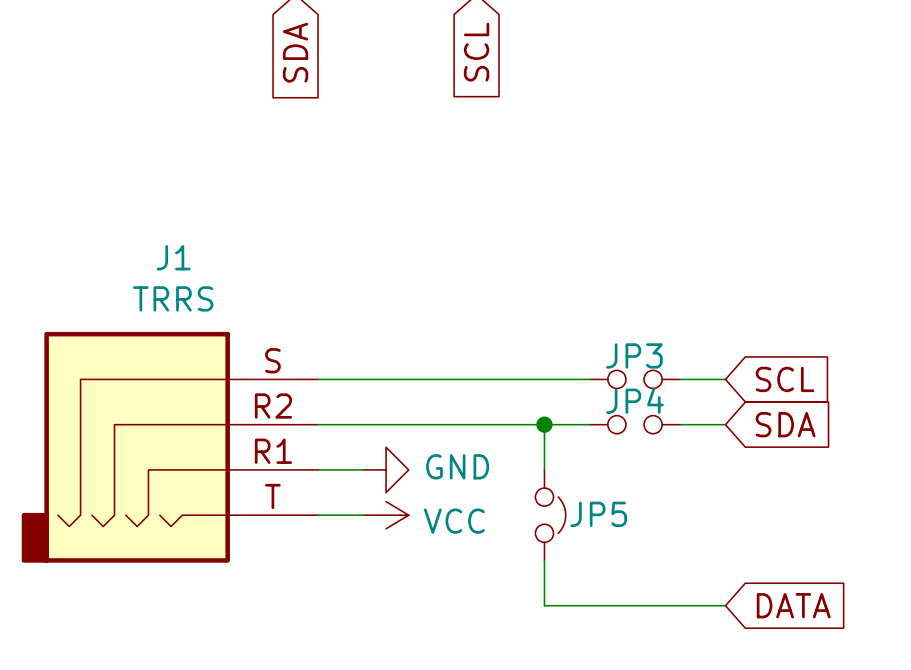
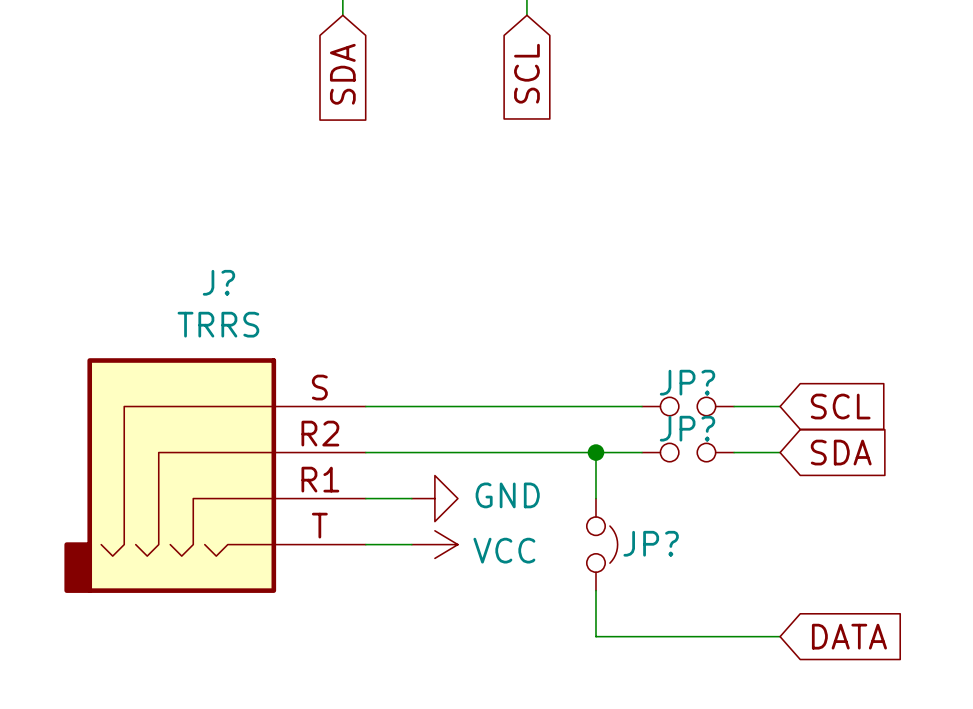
J1 name: J1 (173, 257) -> J? (218, 282)
JP3 name: JP3 (634, 355) -> JP? (687, 382)
JP4 name: JP4 (634, 400) -> JP? (687, 428)
JP5 name: JP5 (598, 514) -> JP? (651, 543)

